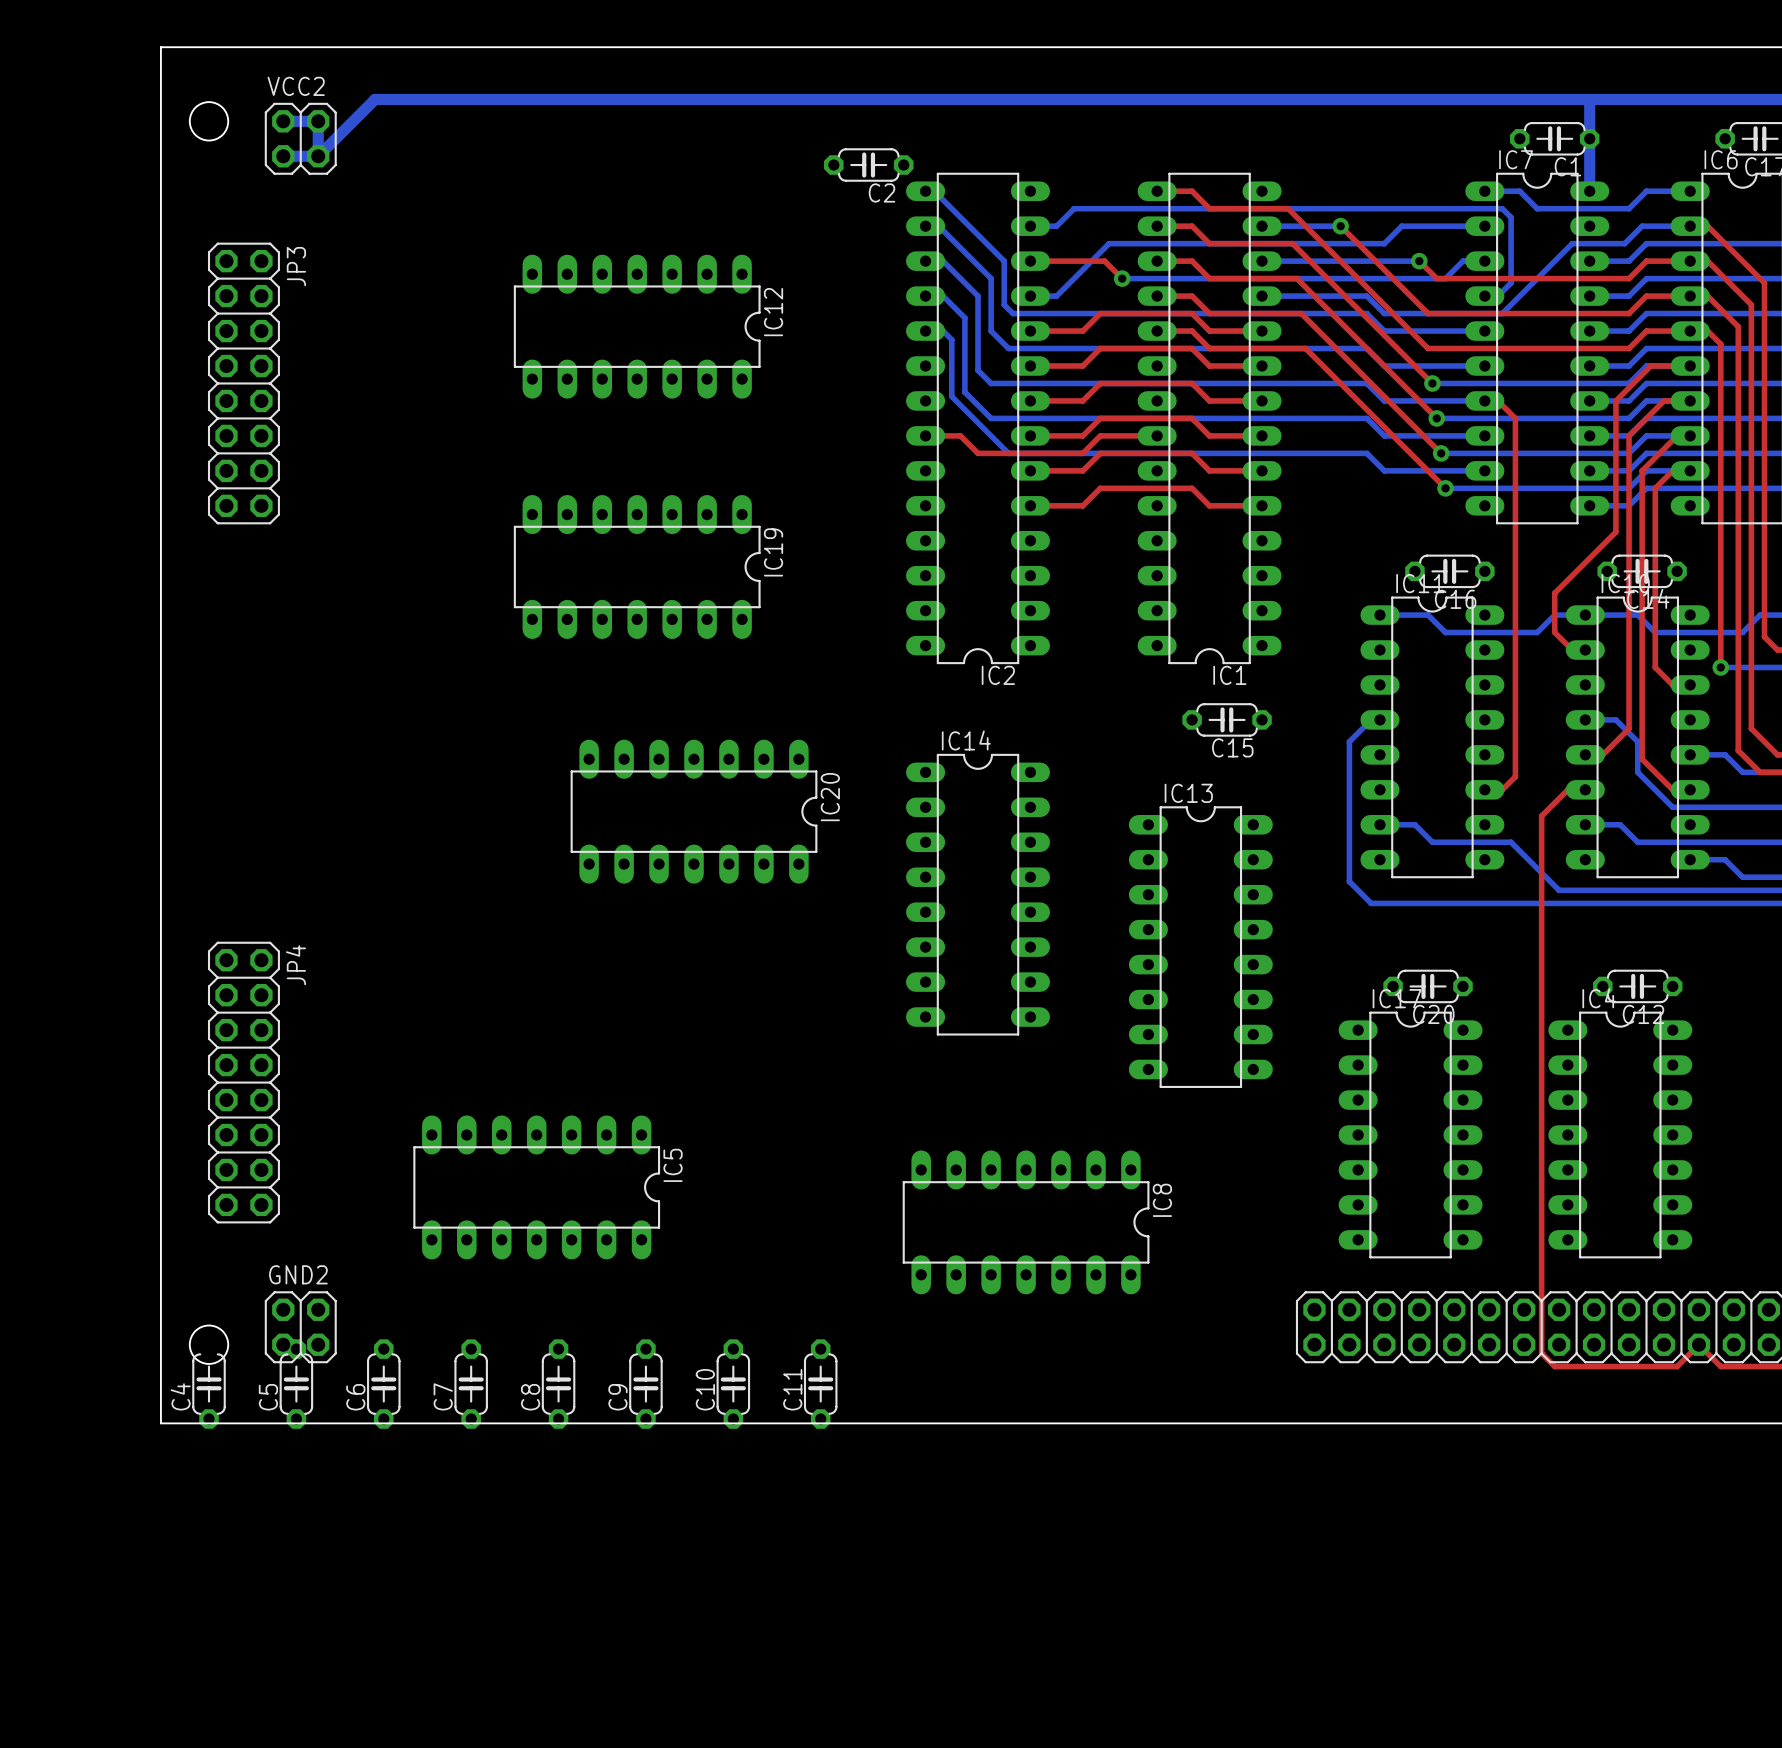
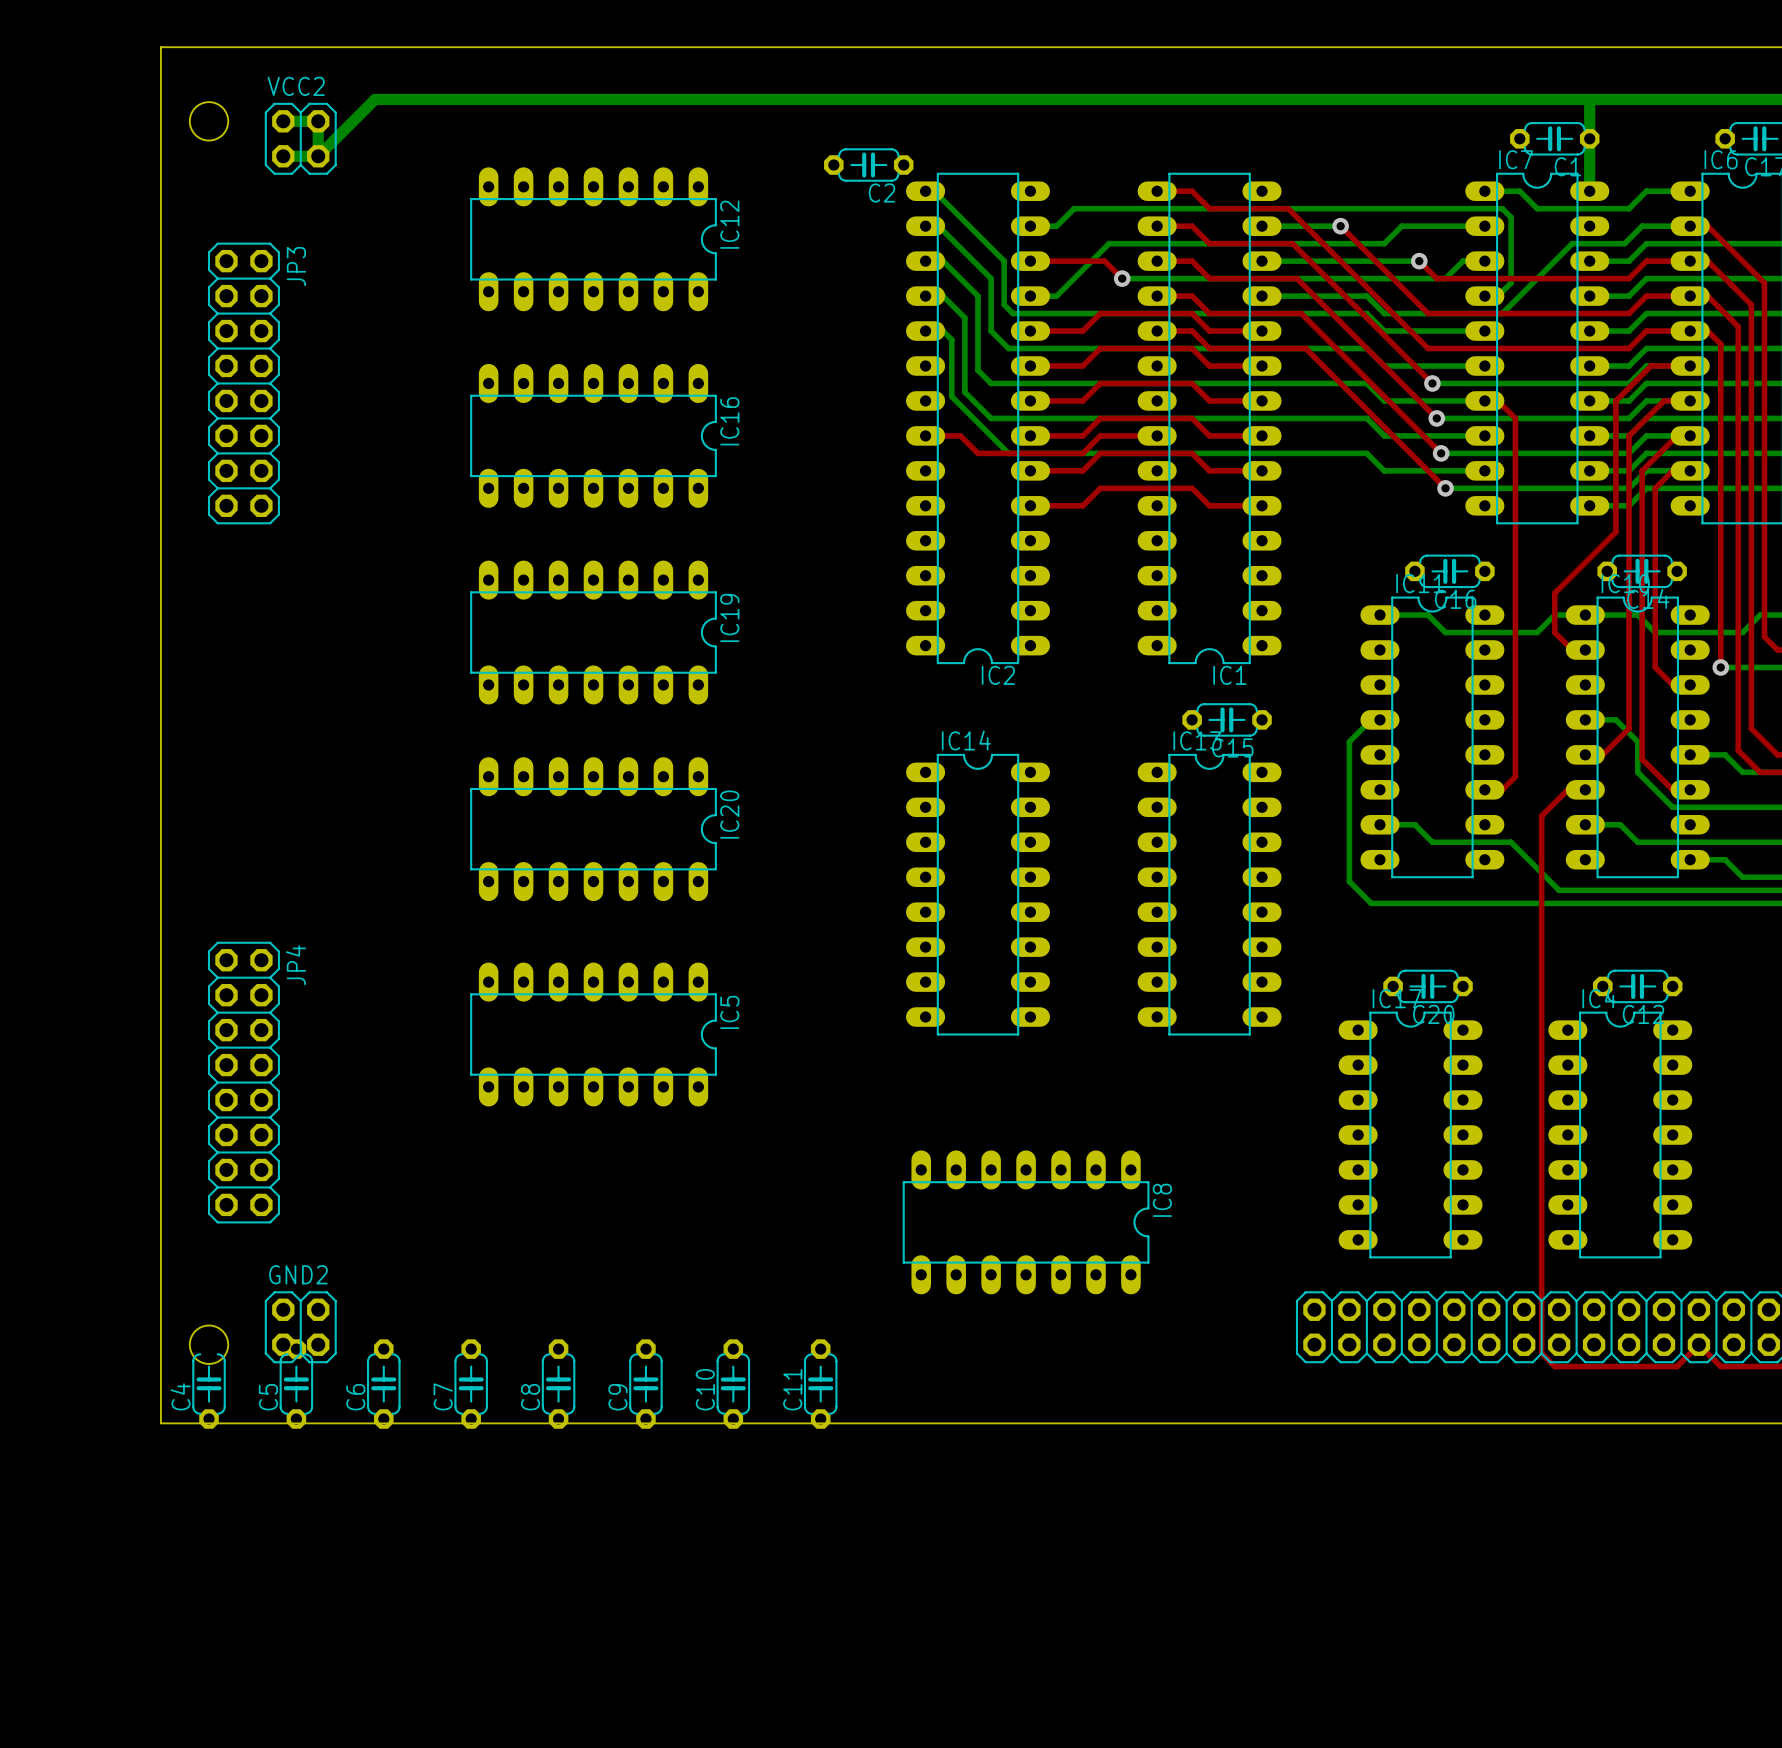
IC12 position: (637, 326) -> (593, 239)
IC16: none -> (593, 435)
IC19 position: (637, 566) -> (593, 632)
IC20 position: (694, 811) -> (593, 829)
IC13 position: (1200, 947) -> (1209, 894)
IC5 footprint: [413, 1115, 661, 1260] -> [470, 962, 717, 1107]

